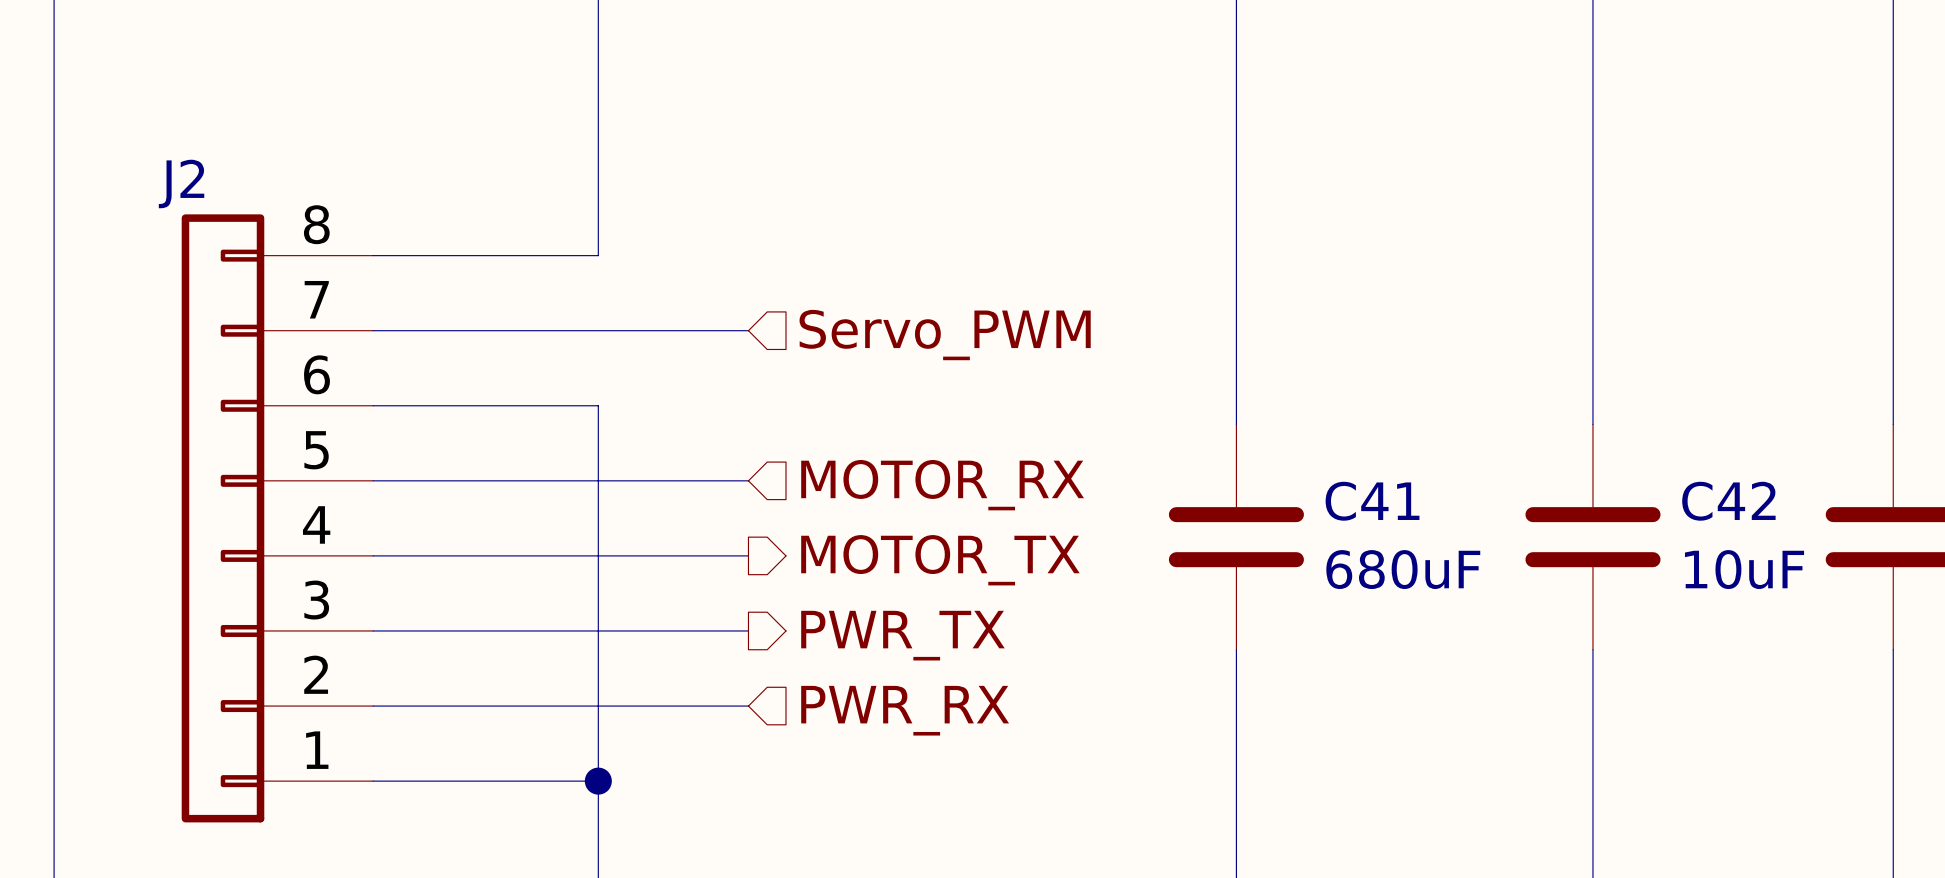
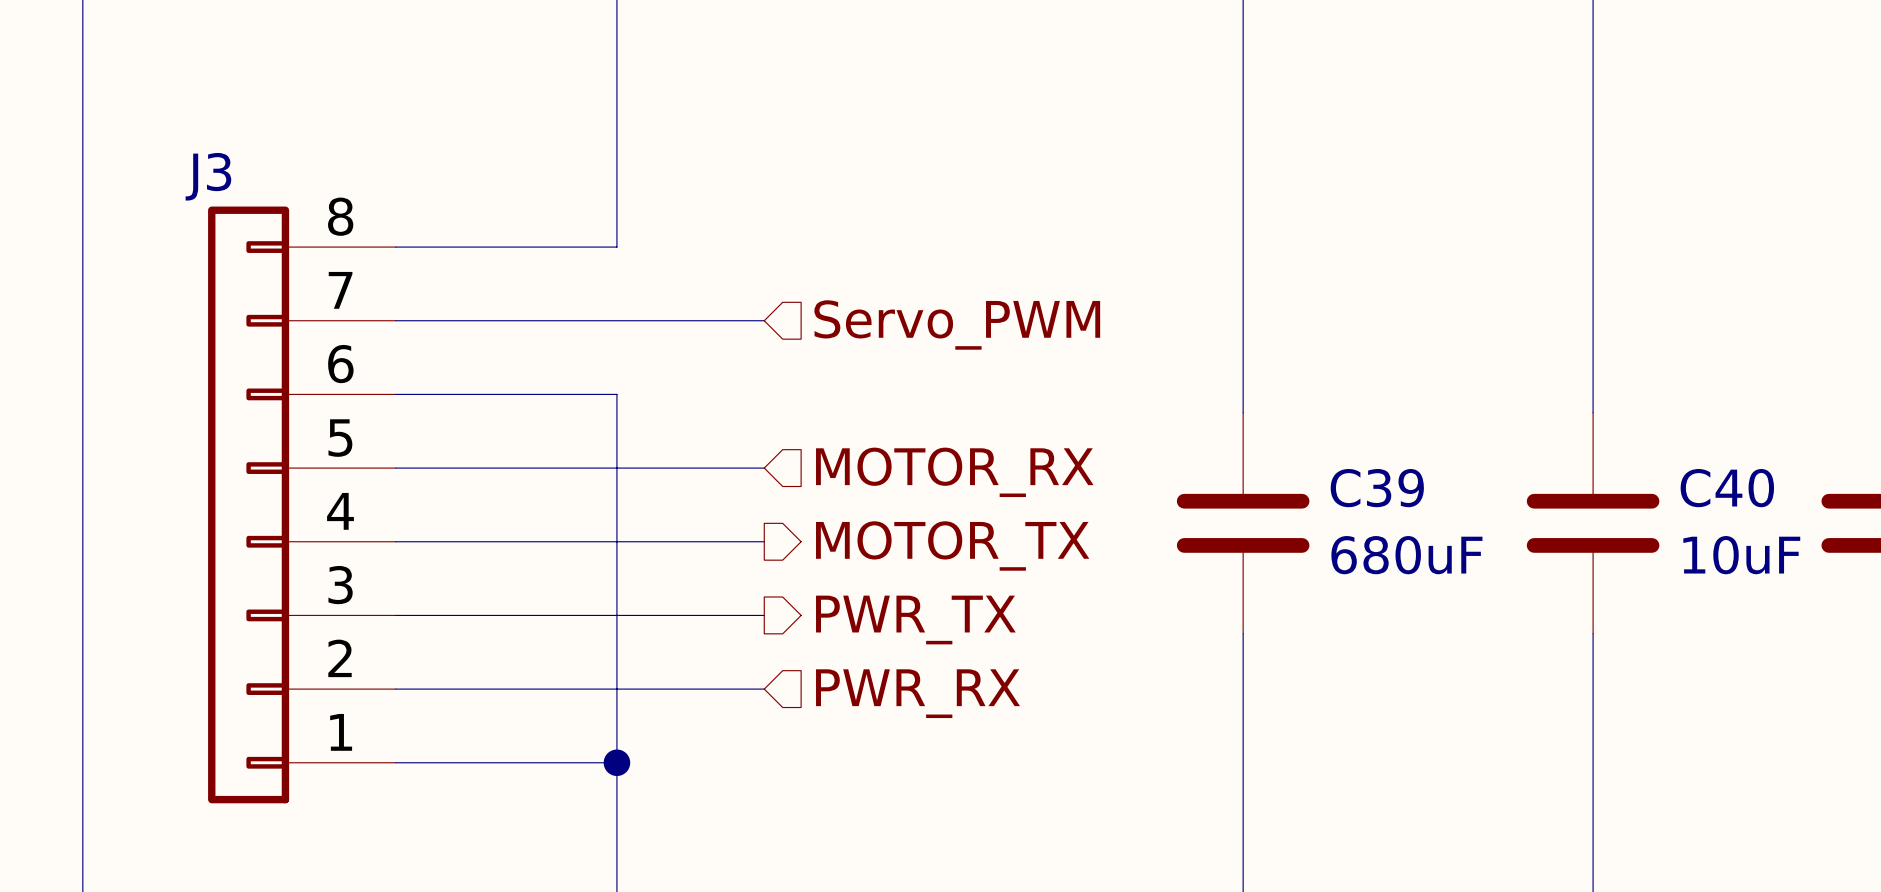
J2 name: J2 (181, 183) -> J3 (208, 176)
C41 name: C41 (1372, 501) -> C39 (1377, 488)
C42 name: C42 (1728, 501) -> C40 (1727, 488)

